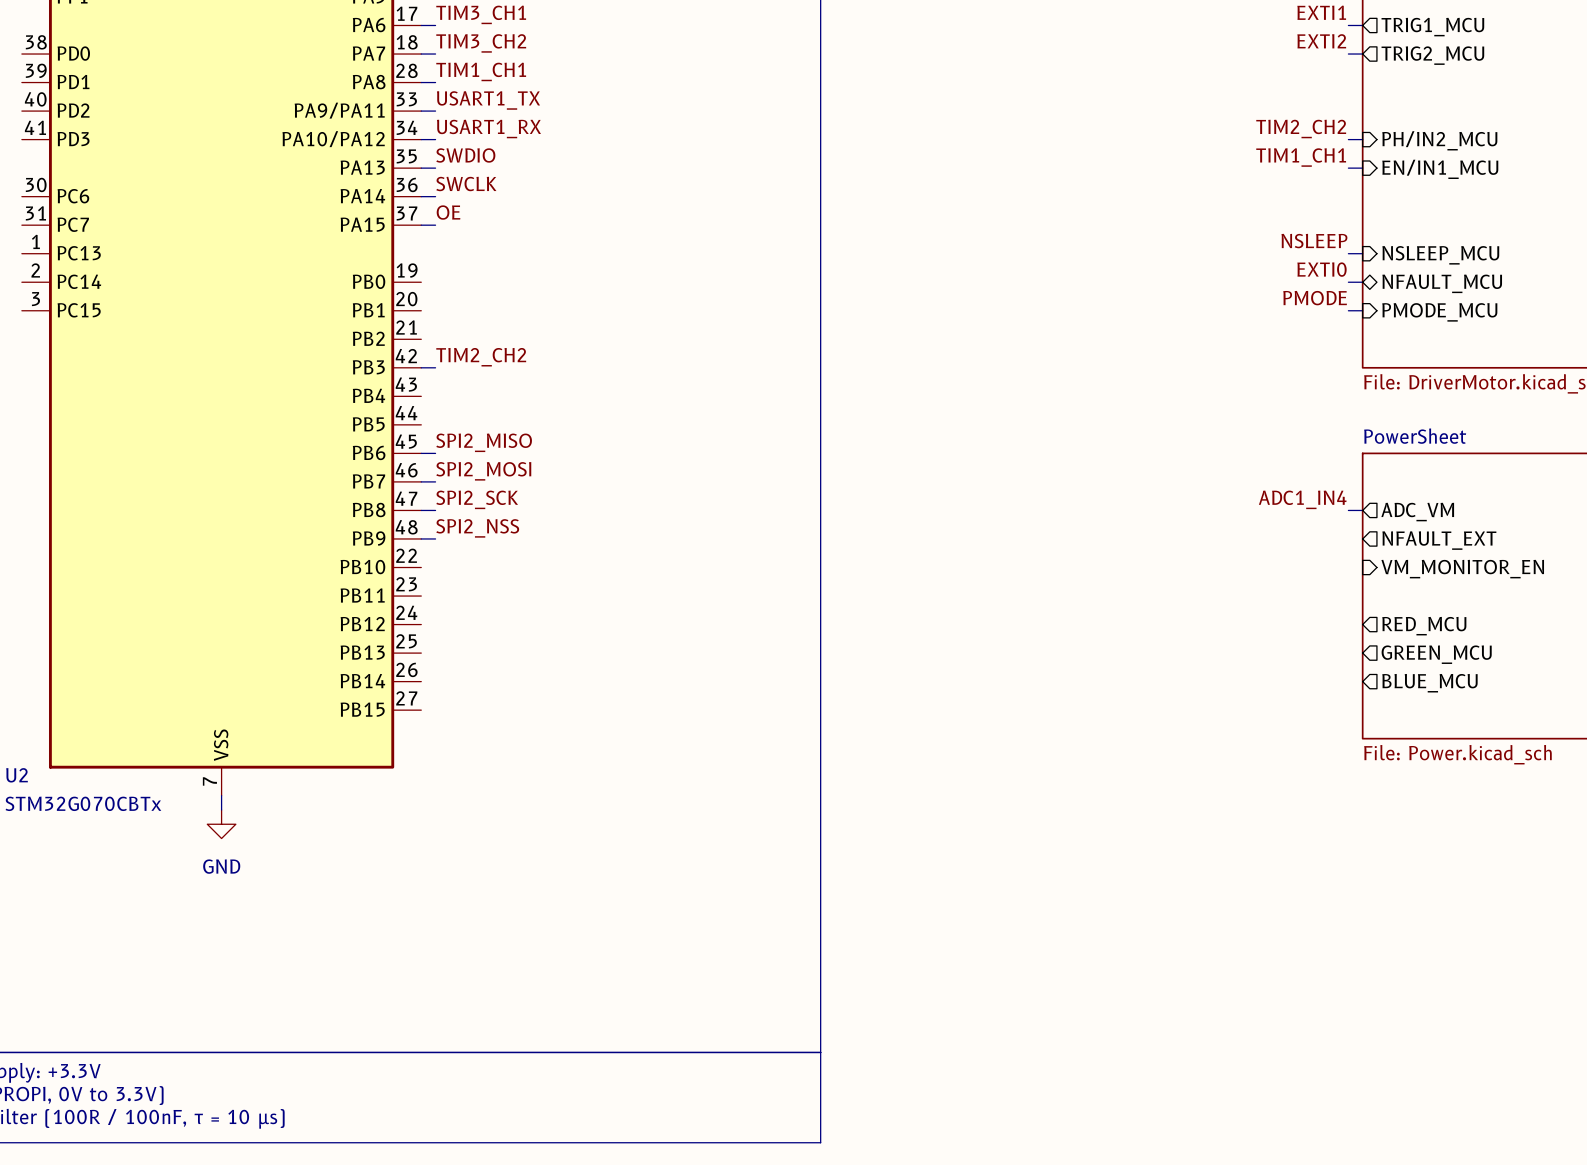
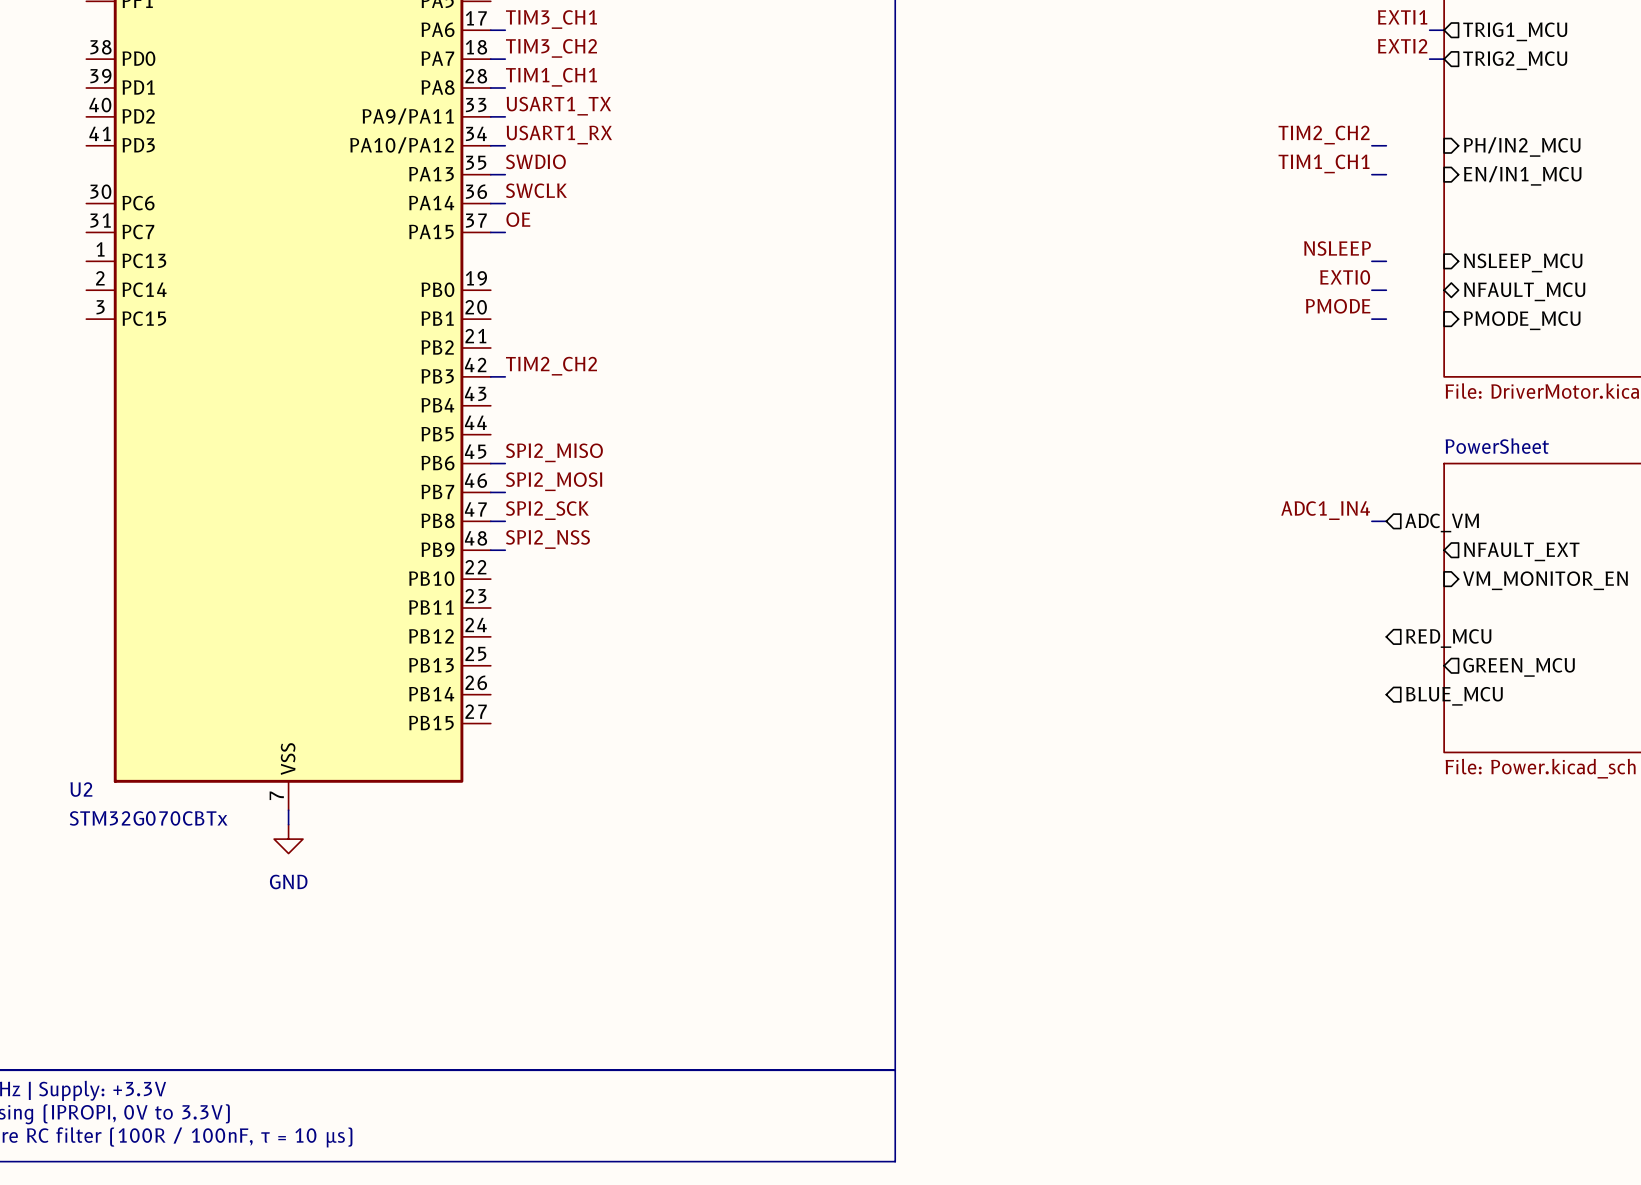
label position: TIM2_CH2 (1301, 129) -> TIM2_CH2 (1324, 135)
wire: (1348, 139) (1362, 139) -> (1371, 145) (1386, 145)
label position: TIM1_CH1 (1301, 157) -> TIM1_CH1 (1324, 163)
wire: (1348, 168) (1362, 168) -> (1371, 174) (1386, 174)
label position: NSLEEP (1314, 241) -> NSLEEP (1337, 248)
wire: (1348, 253) (1362, 253) -> (1371, 261) (1386, 261)
label position: EXTI0 (1321, 269) -> EXTI0 (1345, 277)
wire: (1348, 282) (1362, 282) -> (1371, 290) (1386, 290)
label position: PMODE (1315, 298) -> PMODE (1338, 306)
wire: (1348, 310) (1362, 310) -> (1371, 319) (1386, 319)
label position: ADC1_IN4 (1302, 499) -> ADC1_IN4 (1325, 510)
wire: (1348, 510) (1362, 510) -> (1371, 521) (1386, 521)
sheet pin position: ADC_VM (1417, 512) -> ADC_VM (1442, 522)
sheet pin position: RED_MCU (1424, 626) -> RED_MCU (1448, 638)
sheet pin position: BLUE_MCU (1429, 683) -> BLUE_MCU (1454, 696)

